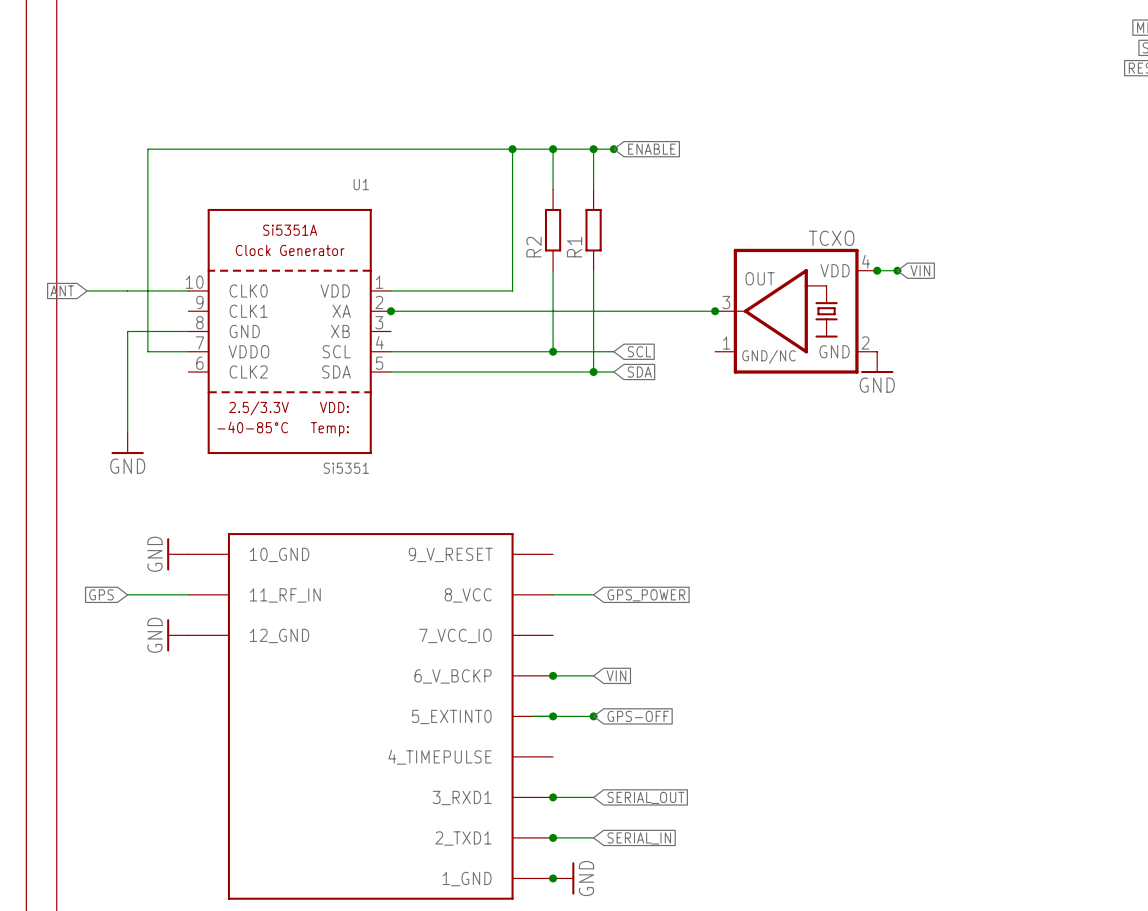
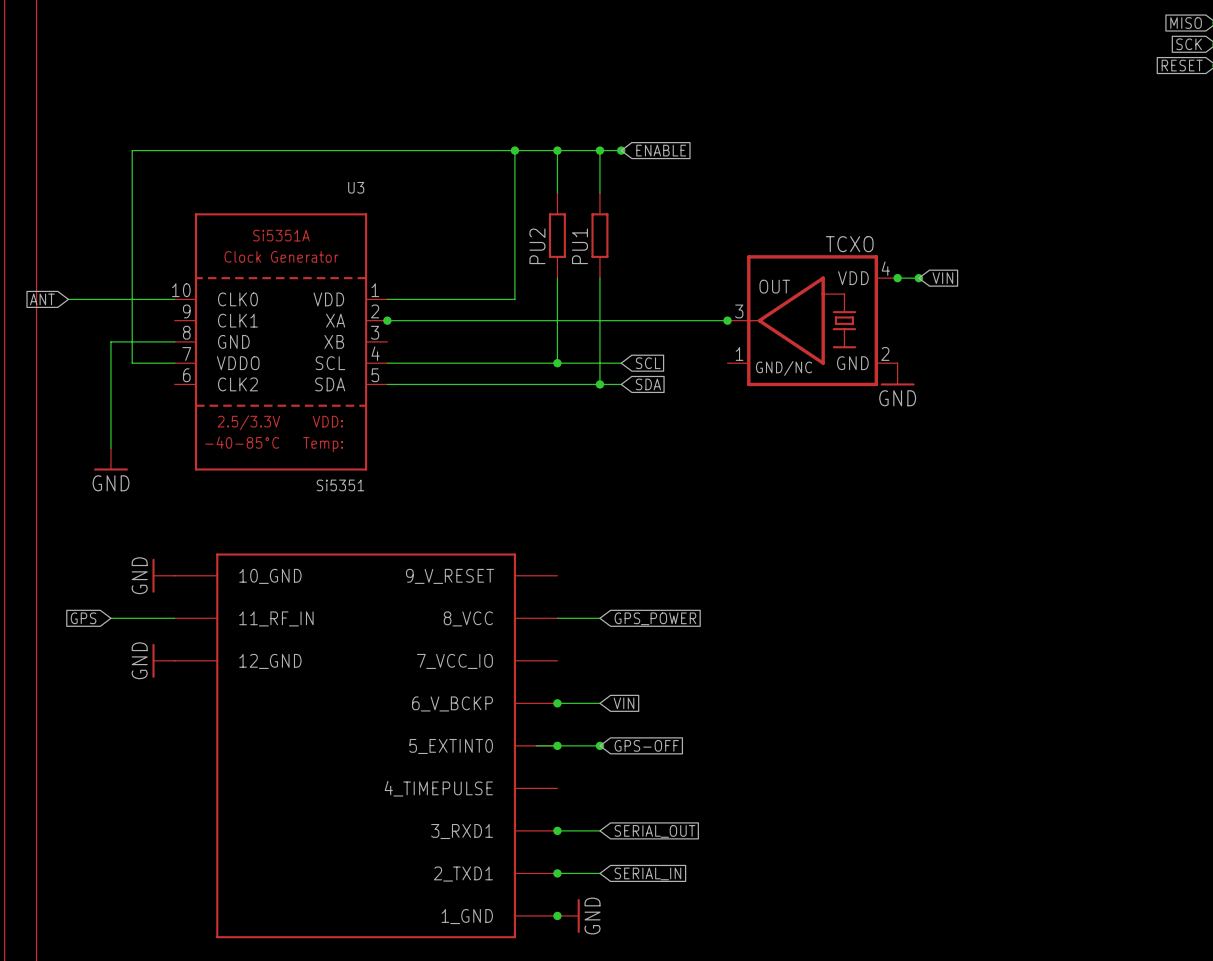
U1 name: U1 (361, 184) -> U3 (356, 187)
R2 name: R2 (534, 247) -> PU2 (537, 246)
R1 name: R1 (574, 247) -> PU1 (579, 246)

